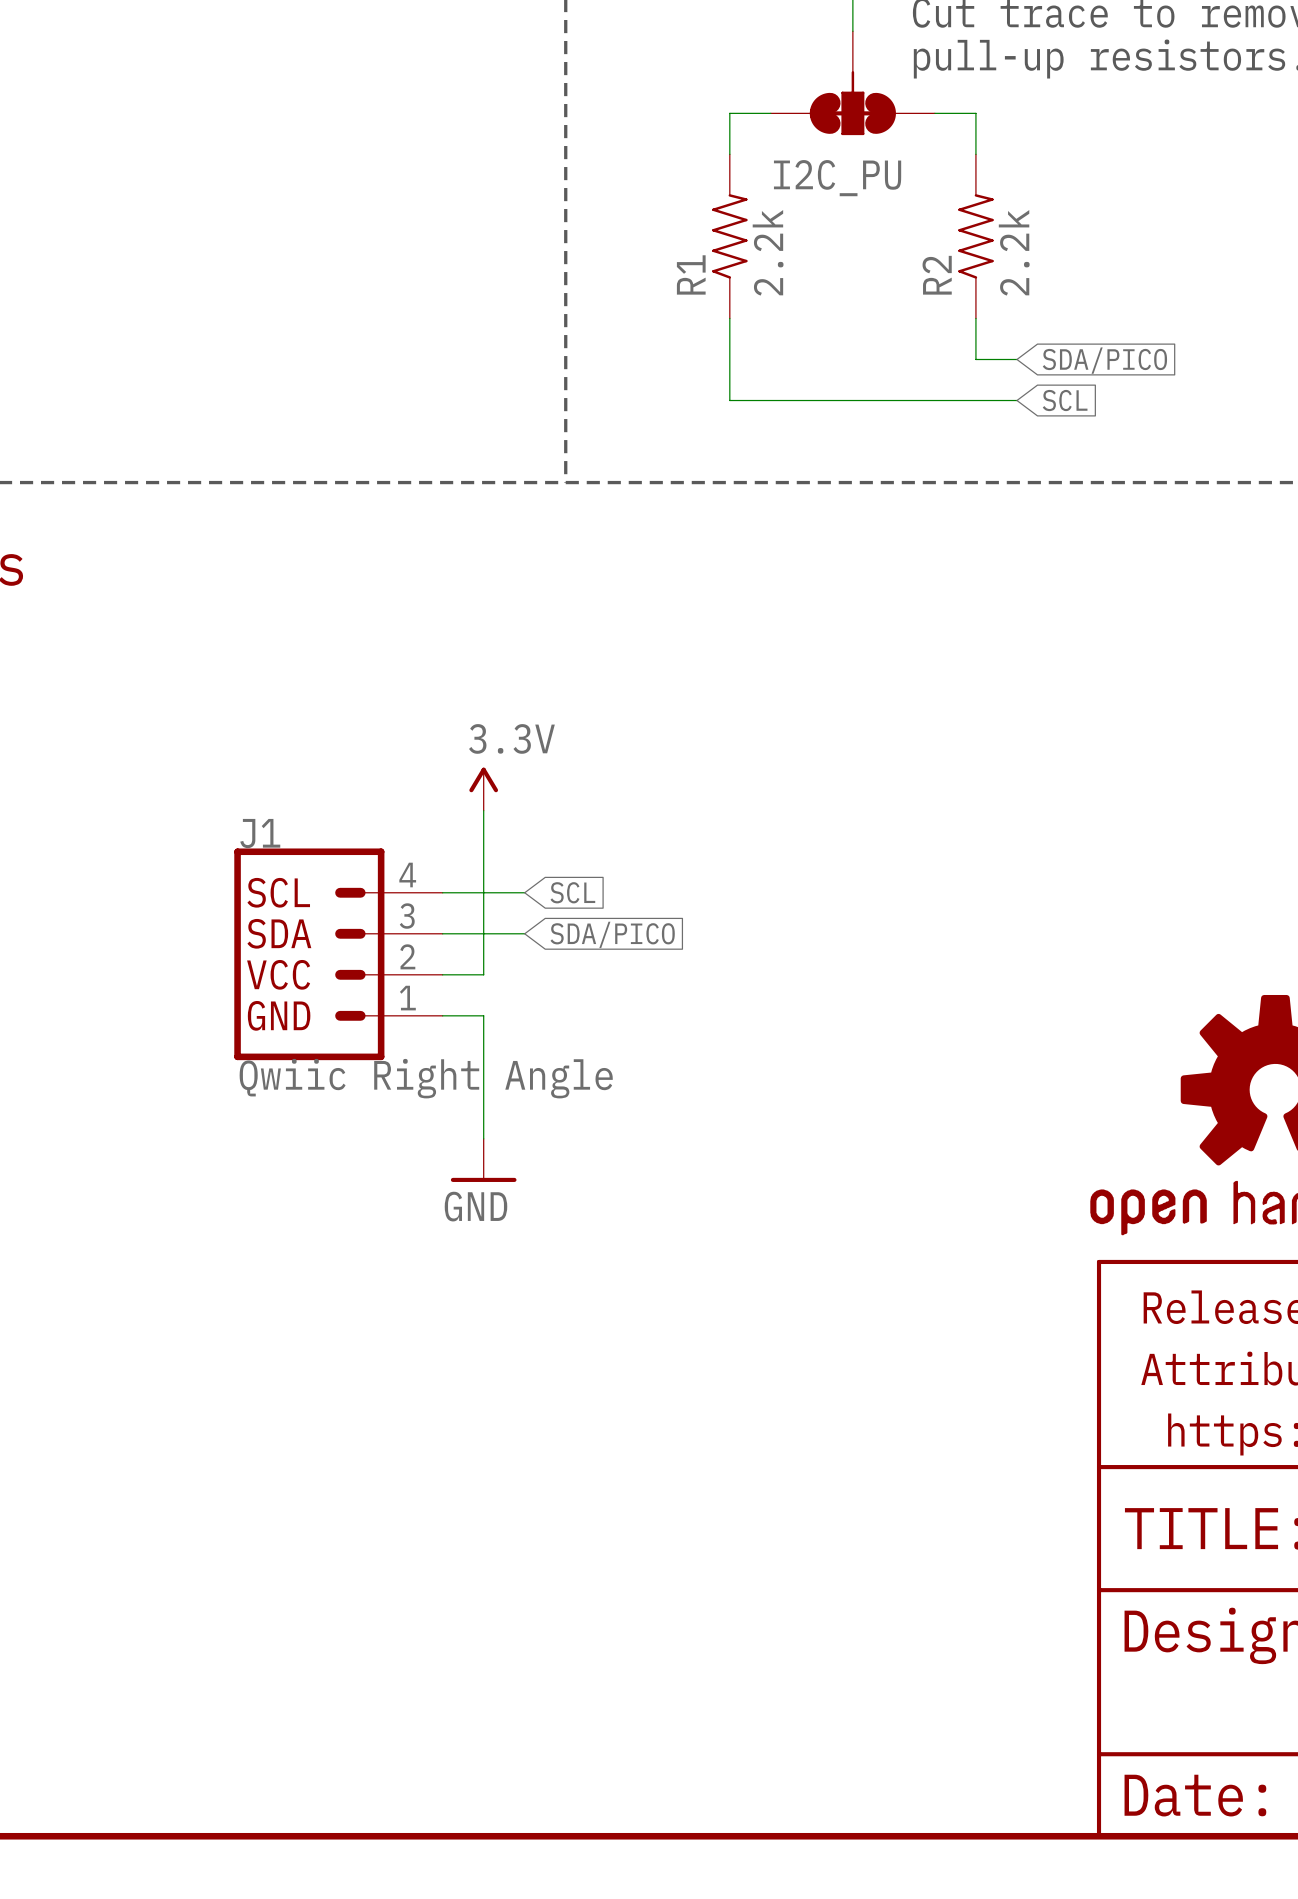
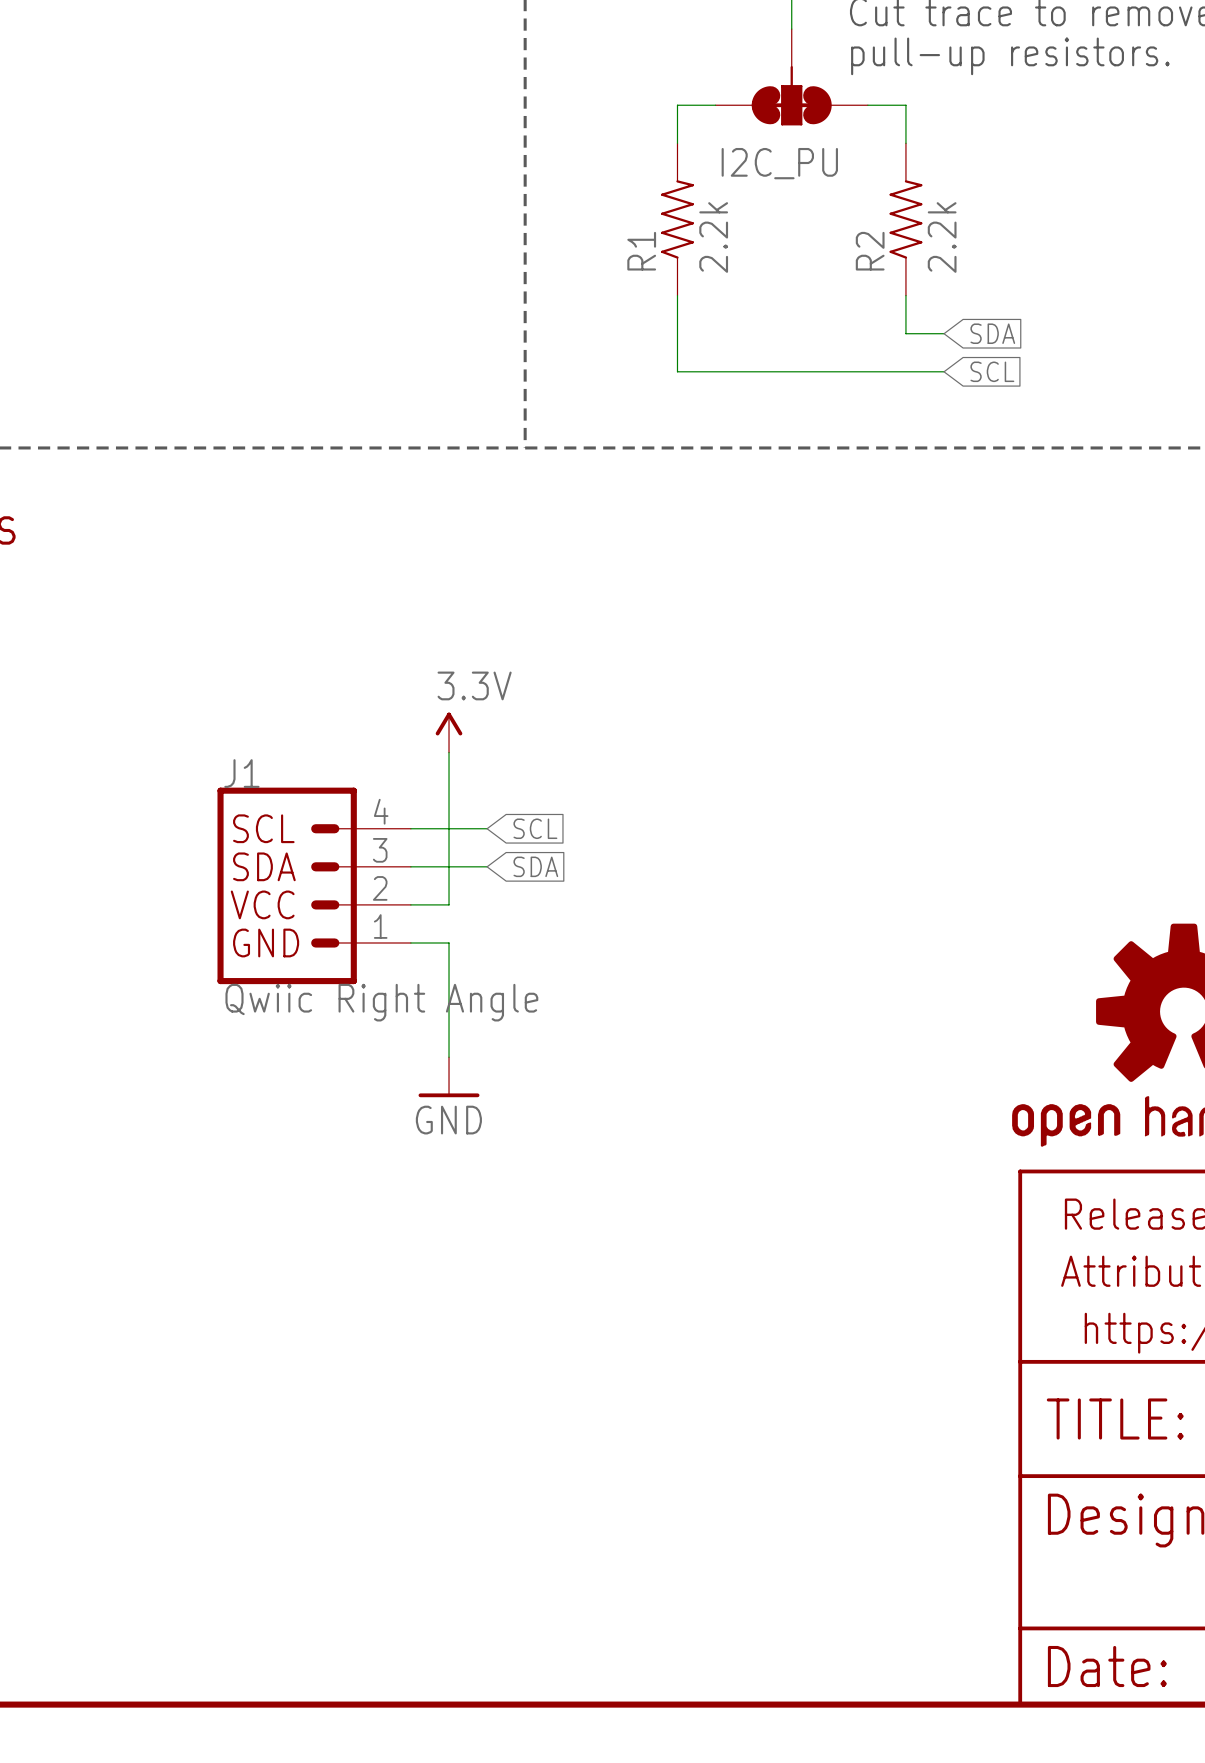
global label: SDA/PICO (1104, 360) -> SDA (992, 333)
global label: SDA/PICO (612, 934) -> SDA (535, 866)

